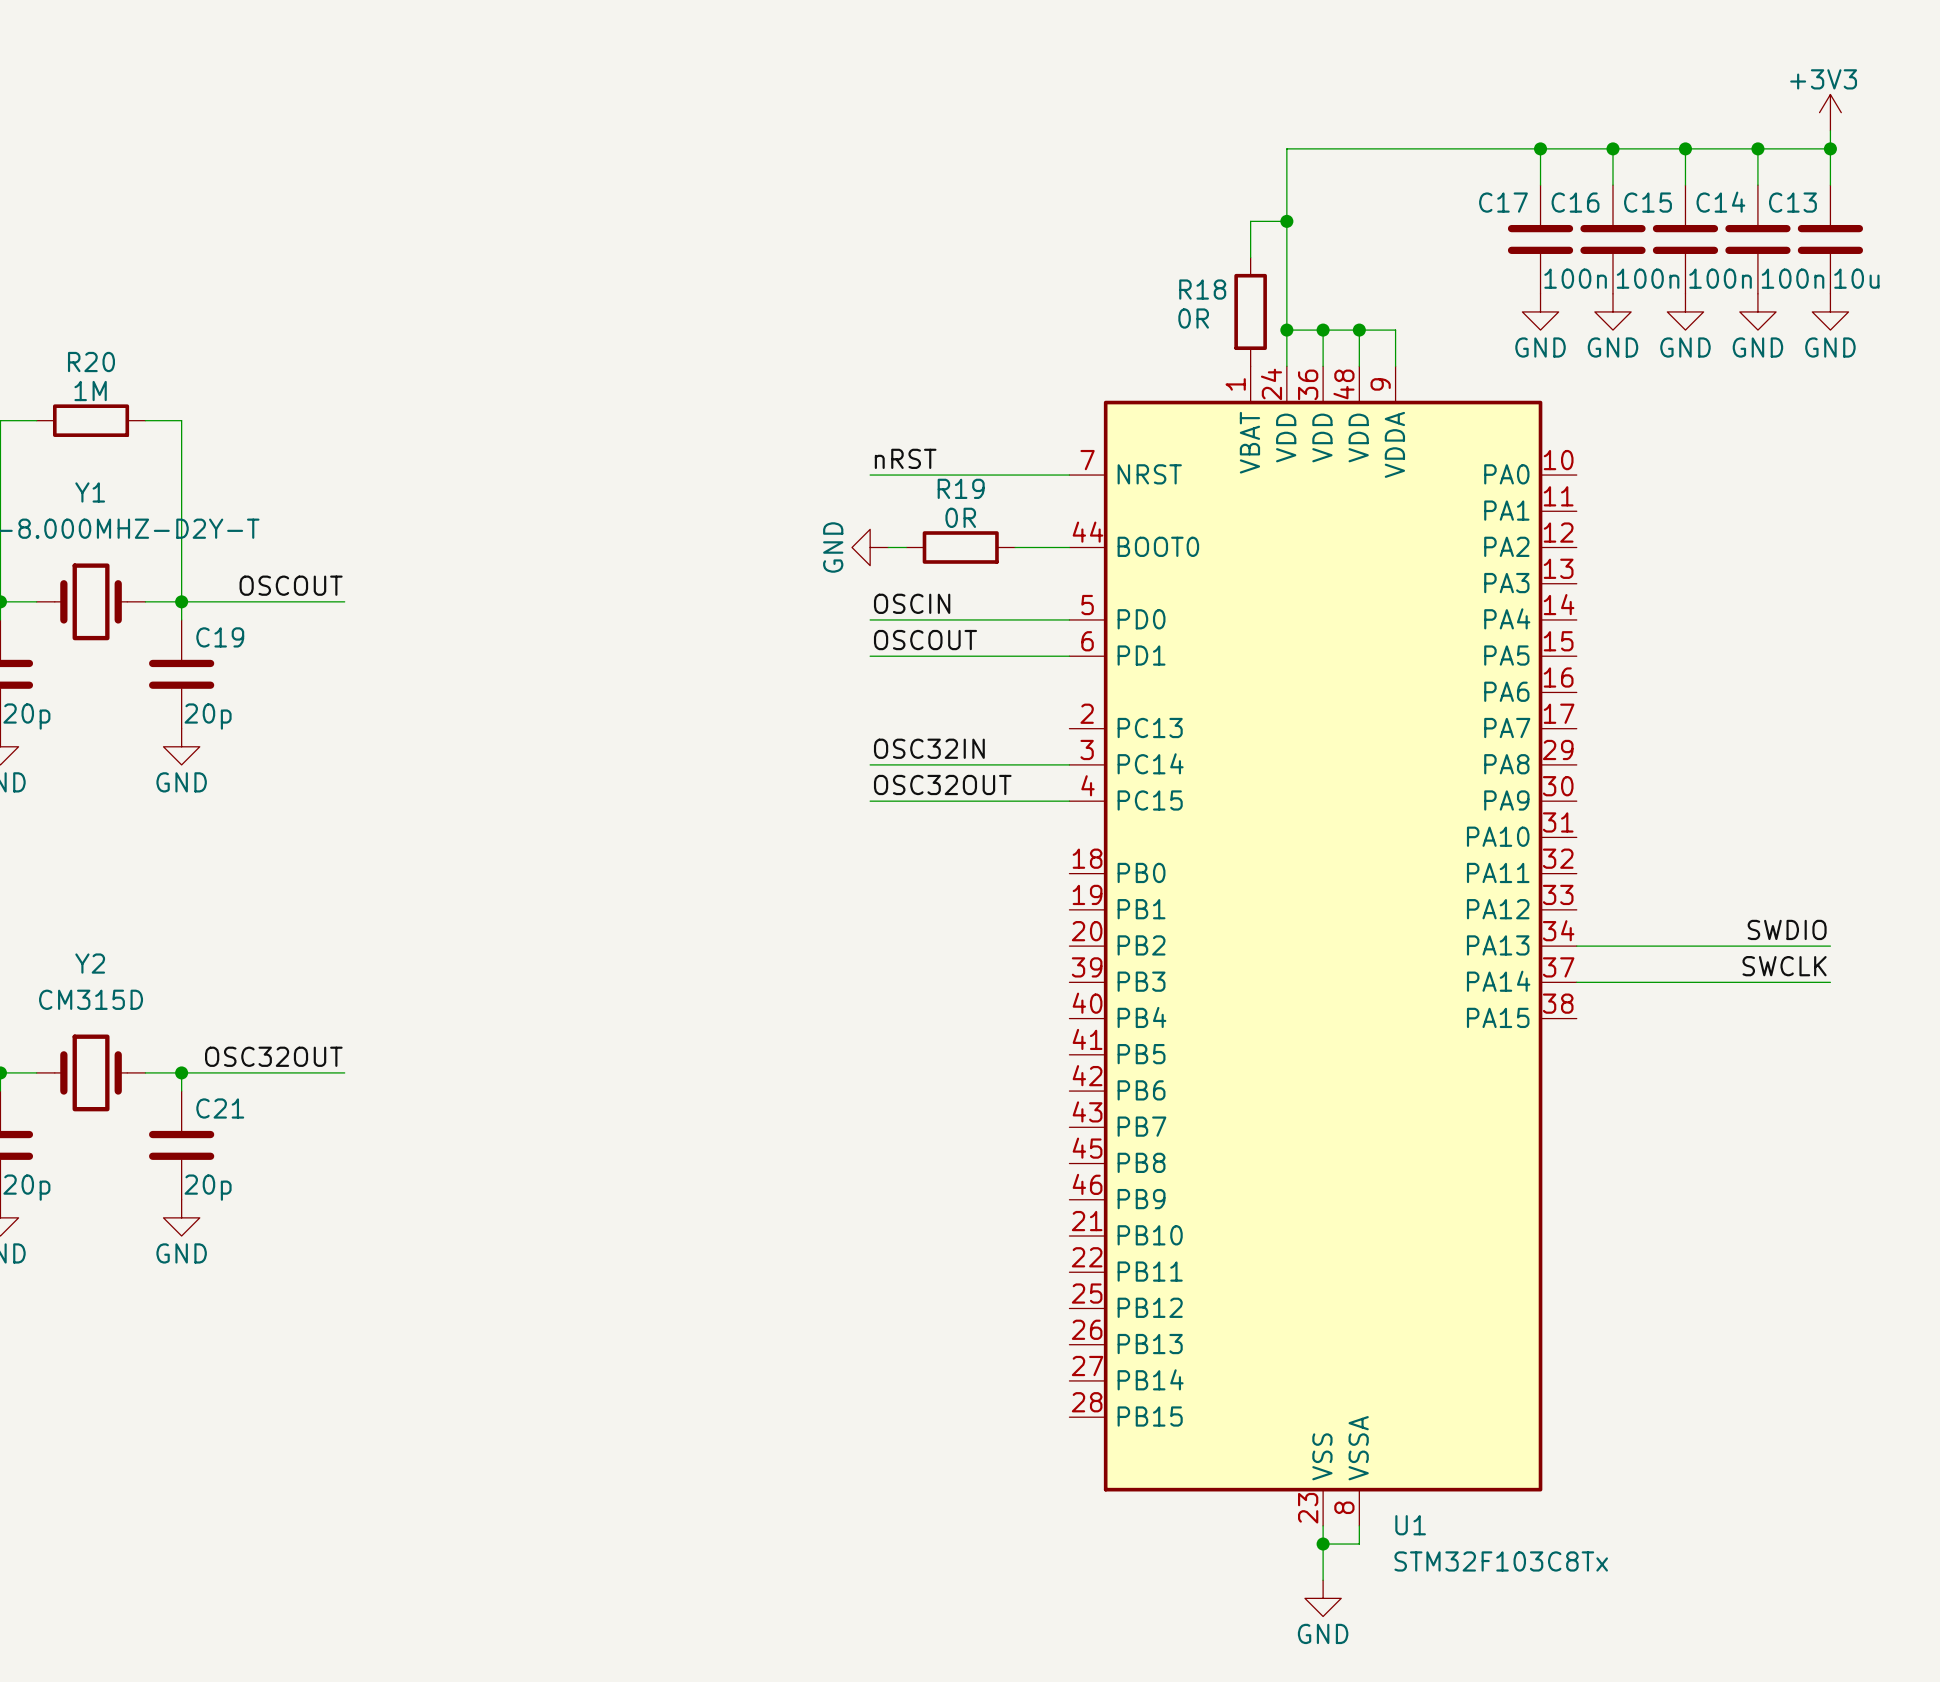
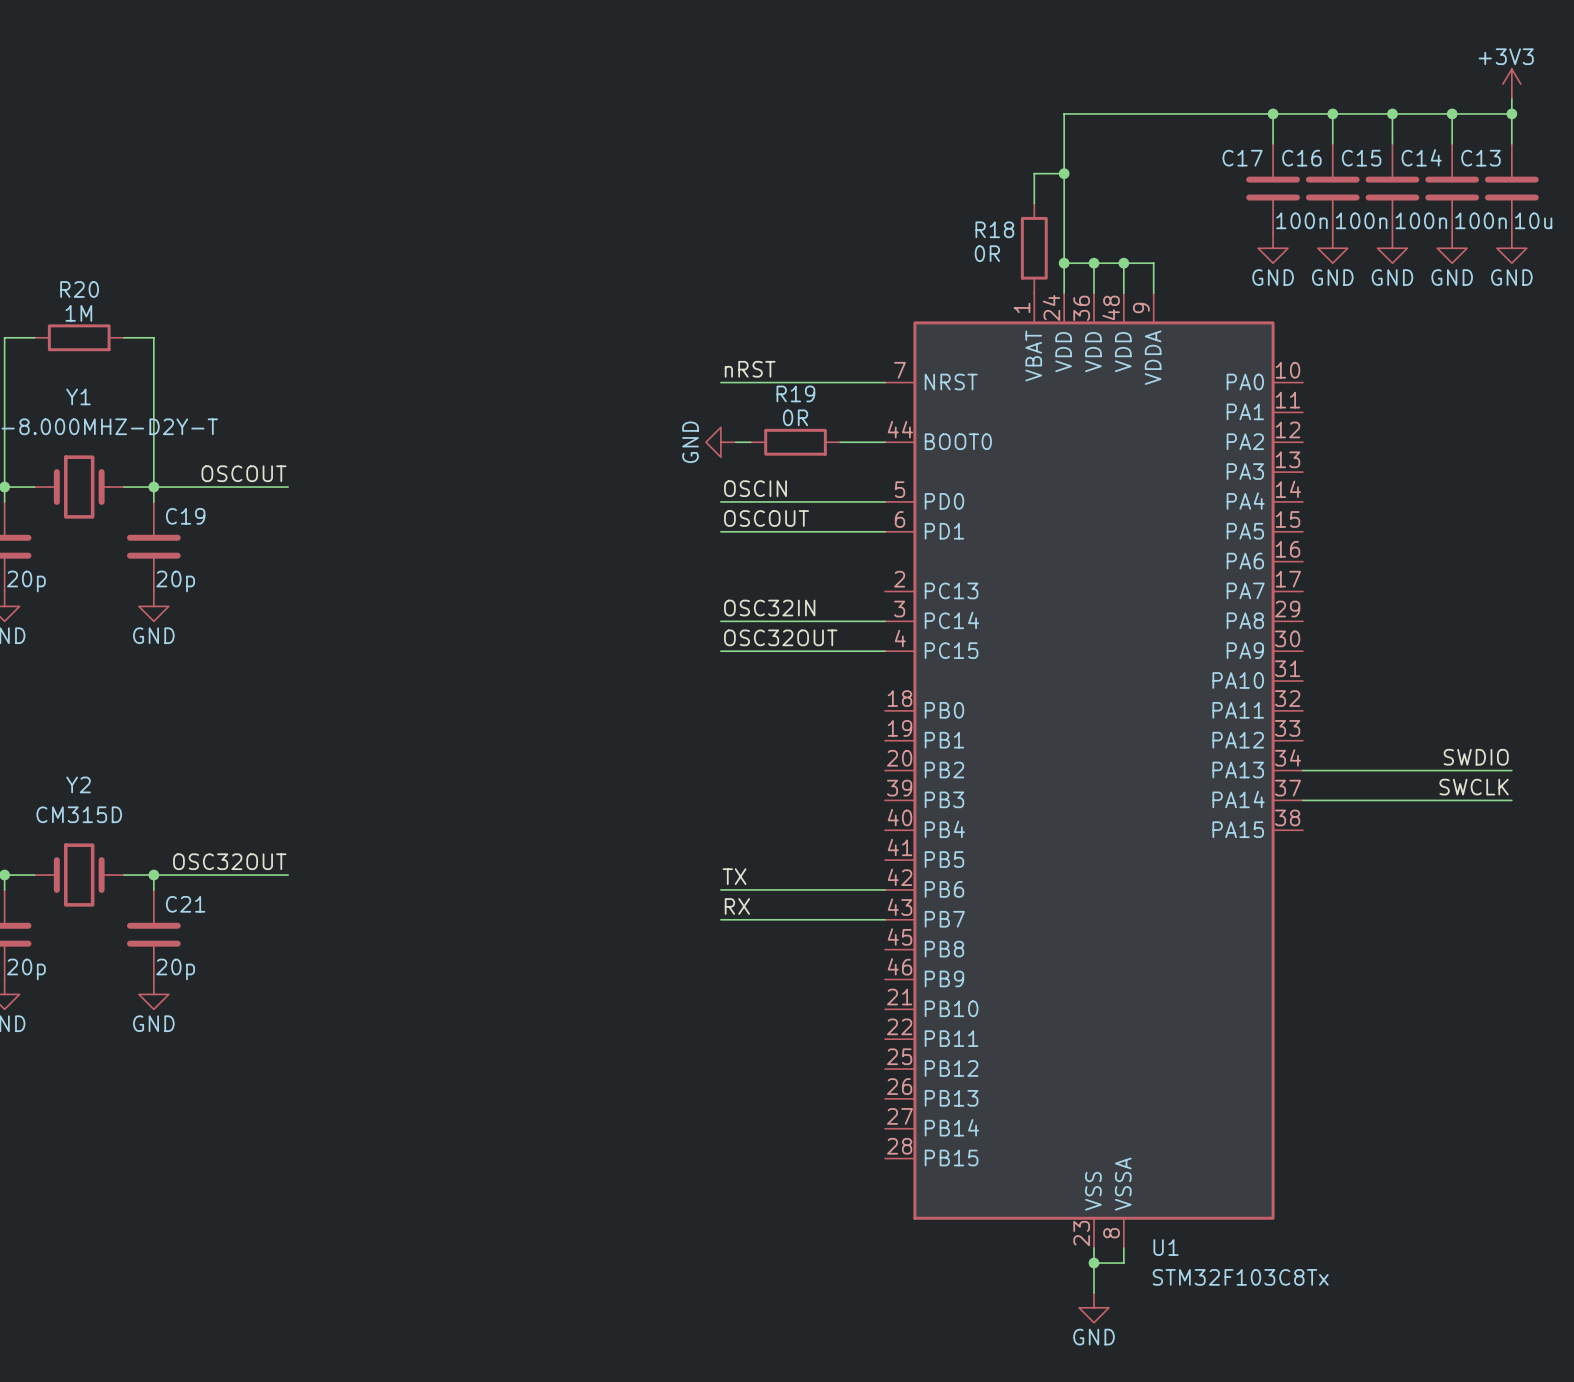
label: none -> TX (734, 876)
wire: none -> (720, 889) (885, 889)
label: none -> RX (737, 906)
wire: none -> (720, 919) (885, 919)

